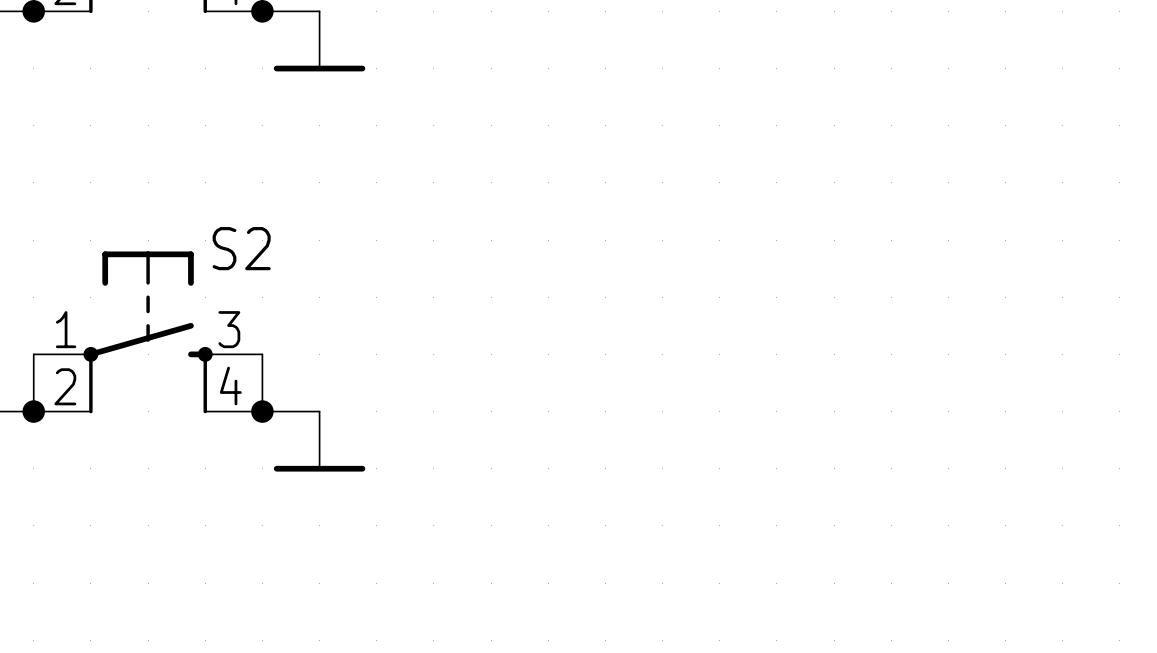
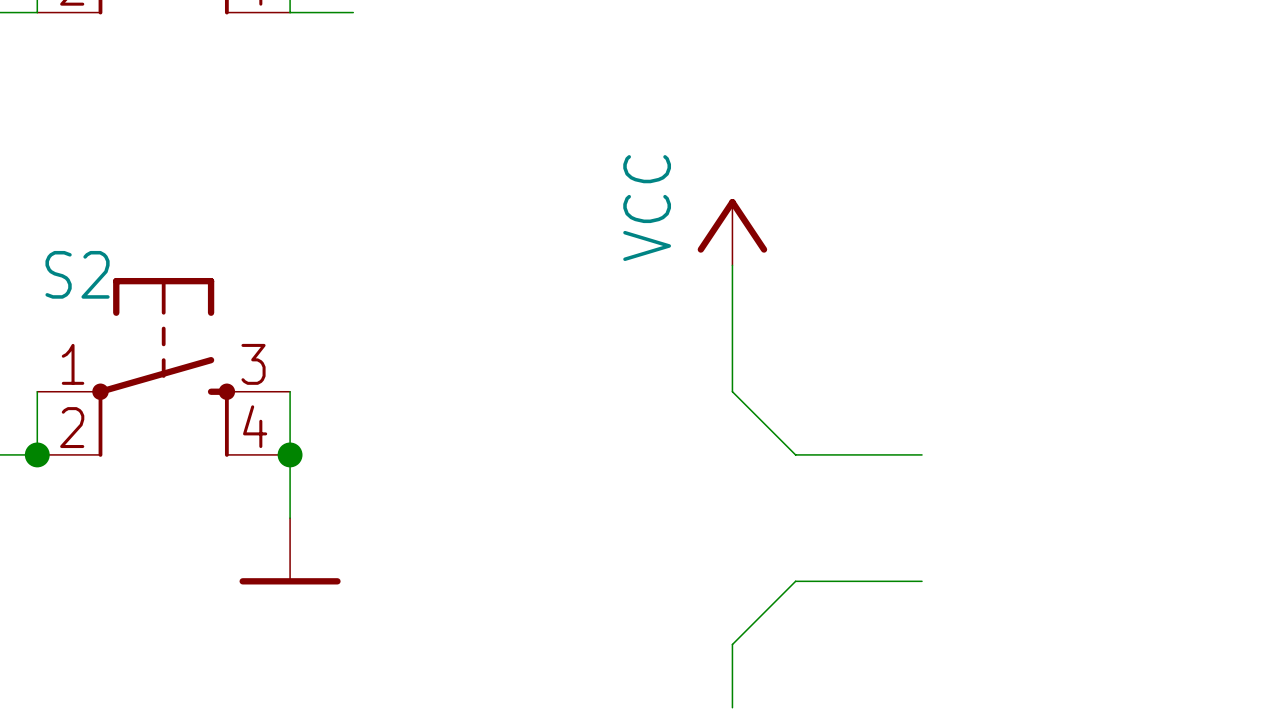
junction: (33, 11) -> none
junction: (262, 11) -> none
power symbol: (319, 41) -> none
power symbol: none -> VCC (732, 232)
wire: none -> (732, 265) (732, 391) (795, 454) (922, 454)
S2 name position: S2 (241, 248) -> S2 (77, 274)
wire: (262, 411) (319, 411) -> (290, 454) (290, 518)
power symbol position: (319, 441) -> (290, 551)
wire: none -> (922, 581) (795, 581) (732, 644) (732, 707)

